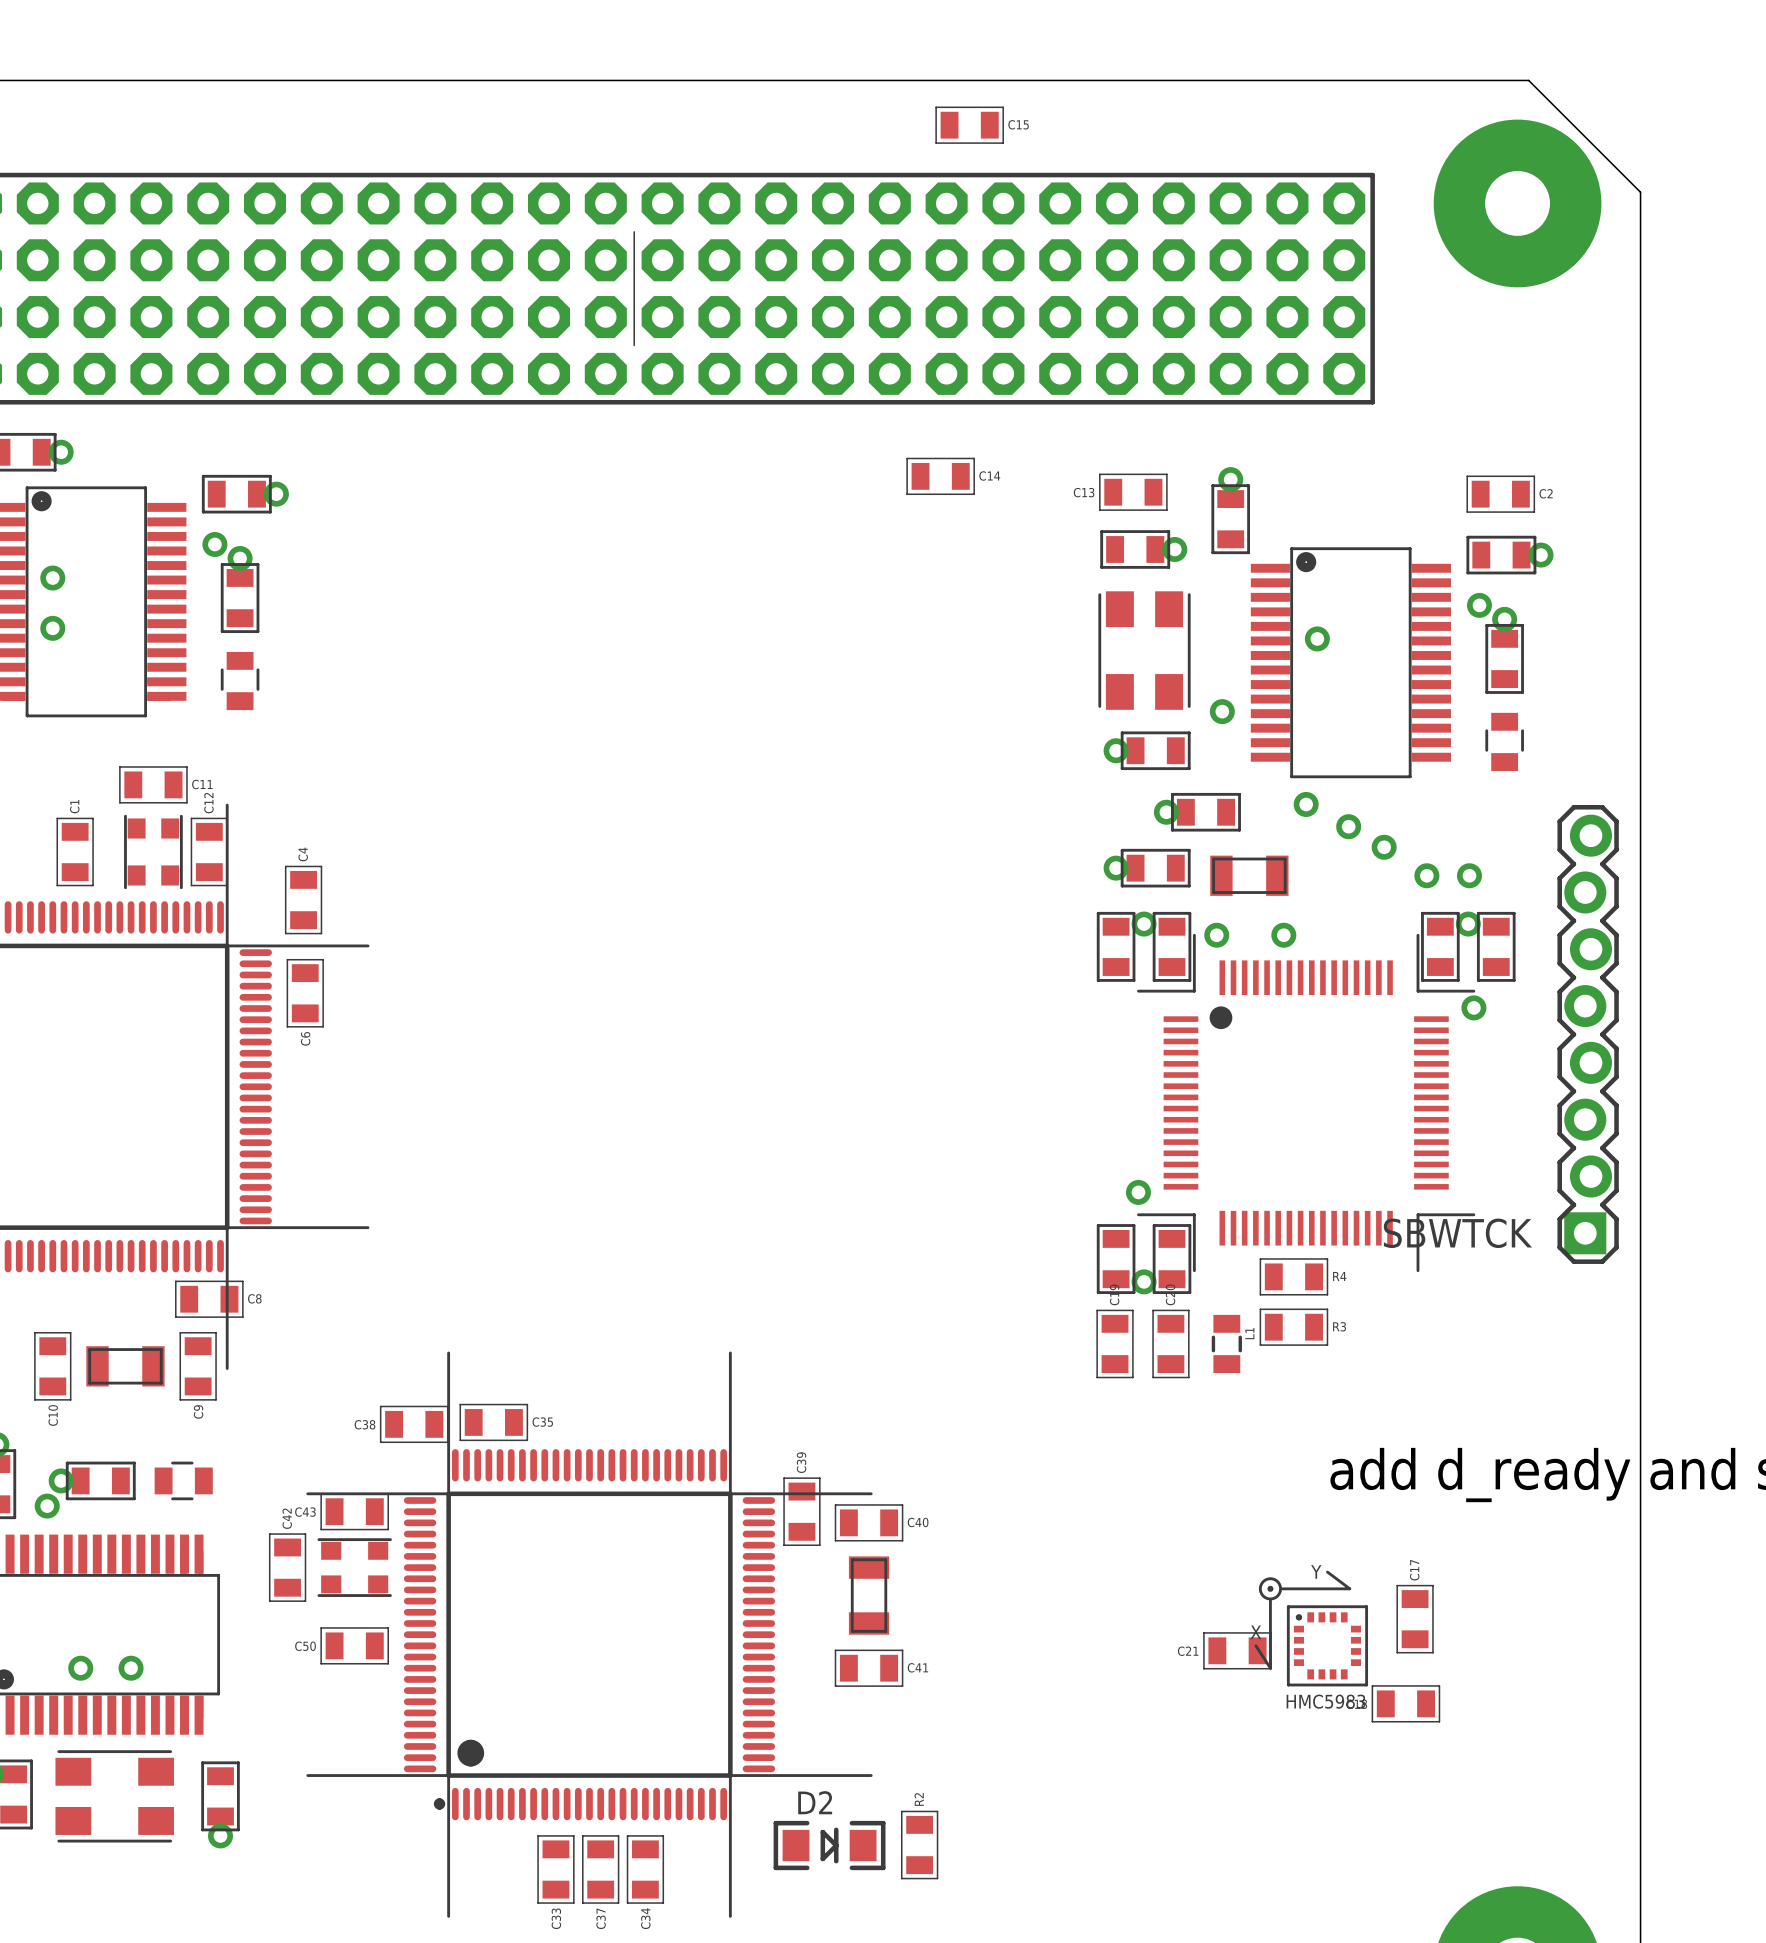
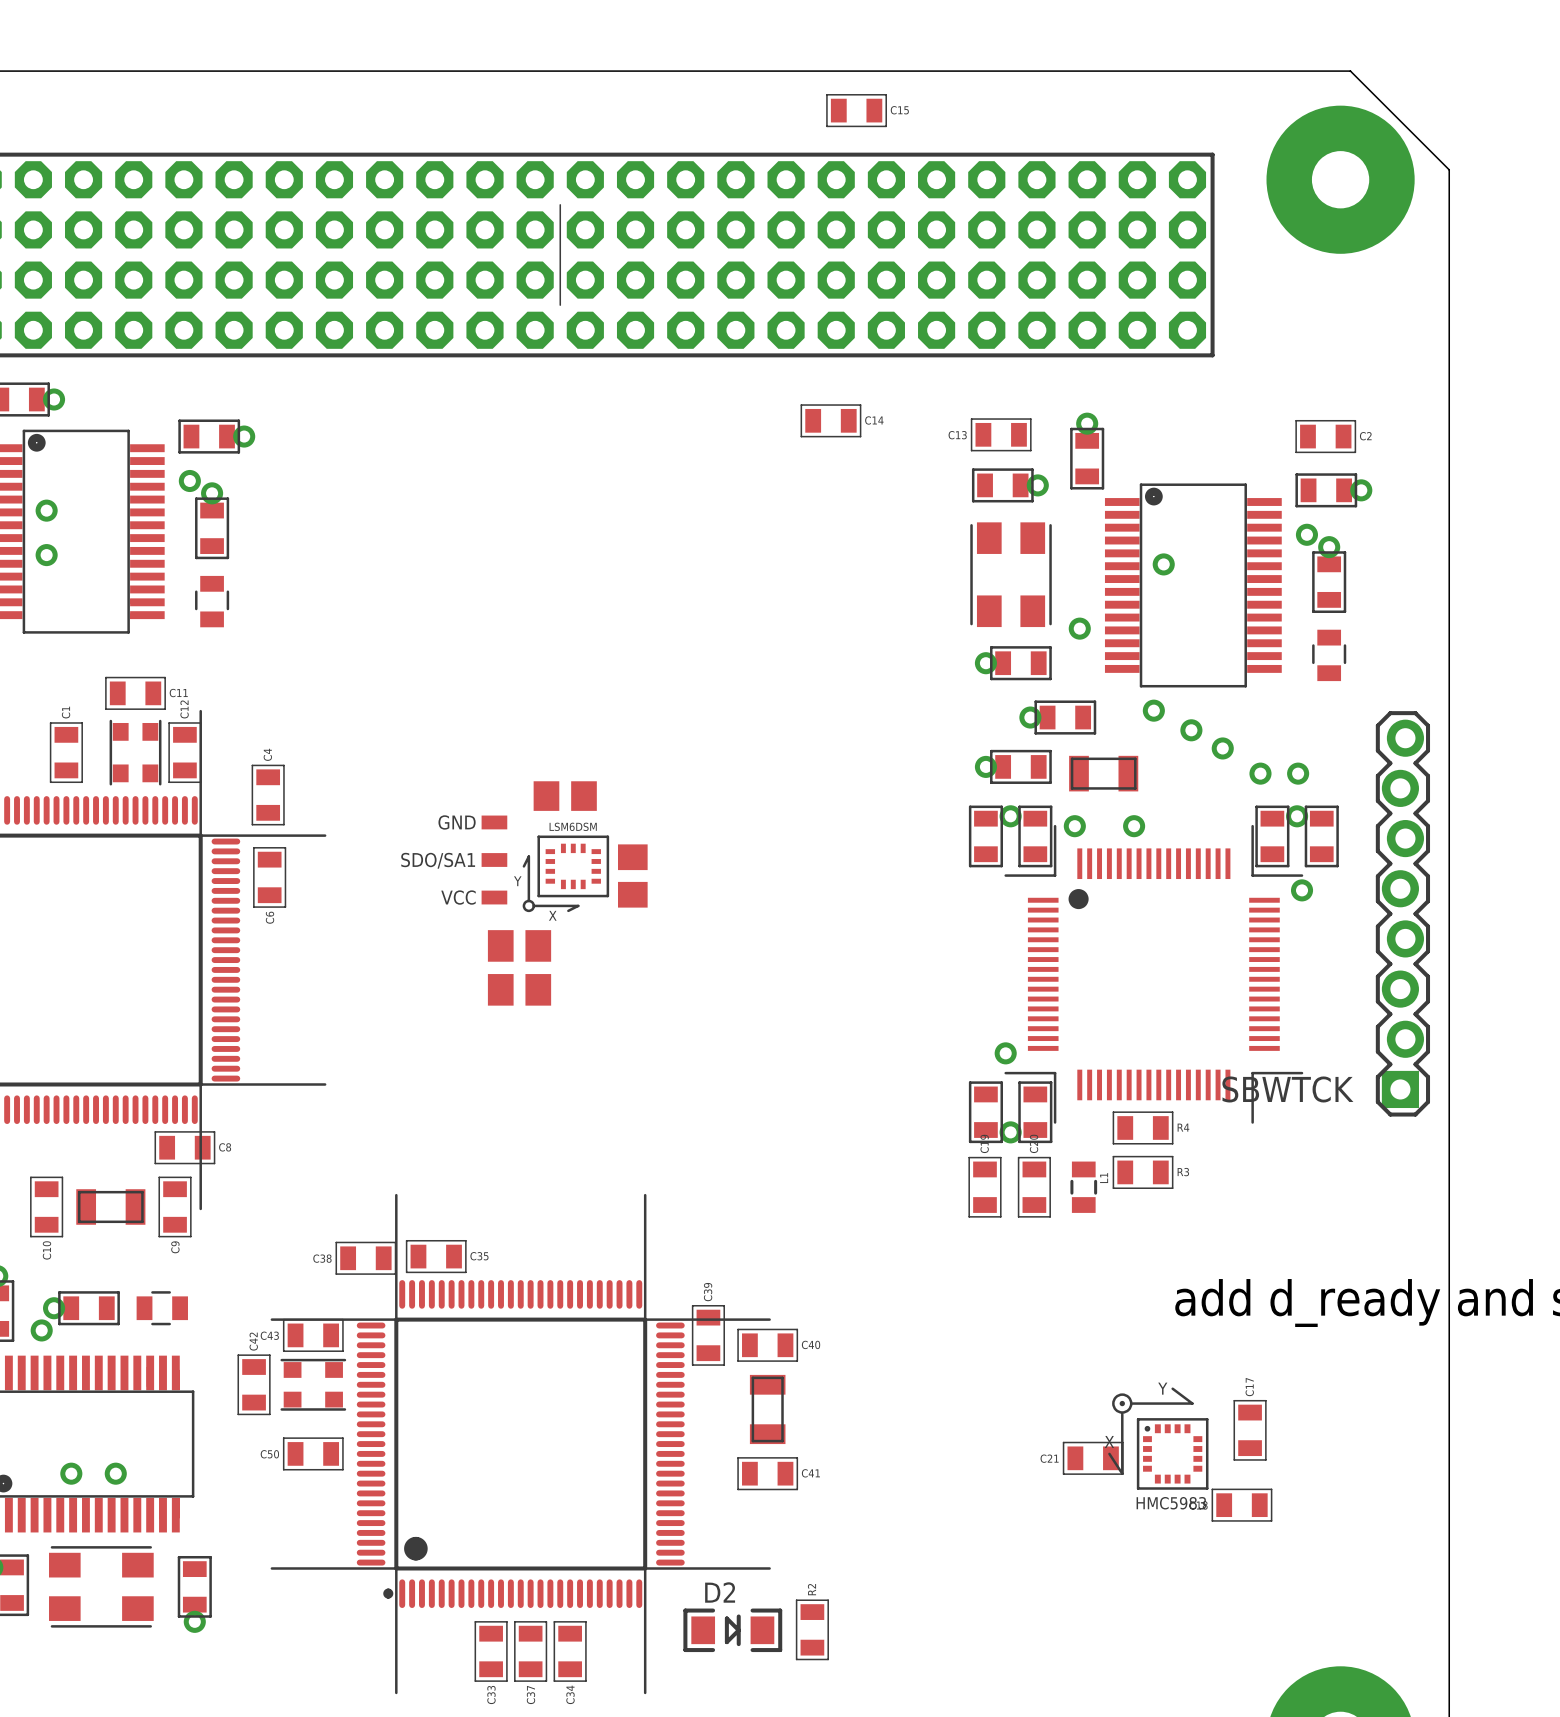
part: none -> (565, 796)
SDO/SA1: none -> (494, 859)
part: none -> (565, 873)
part: none -> (632, 875)
part: none -> (519, 945)
part: none -> (519, 989)

